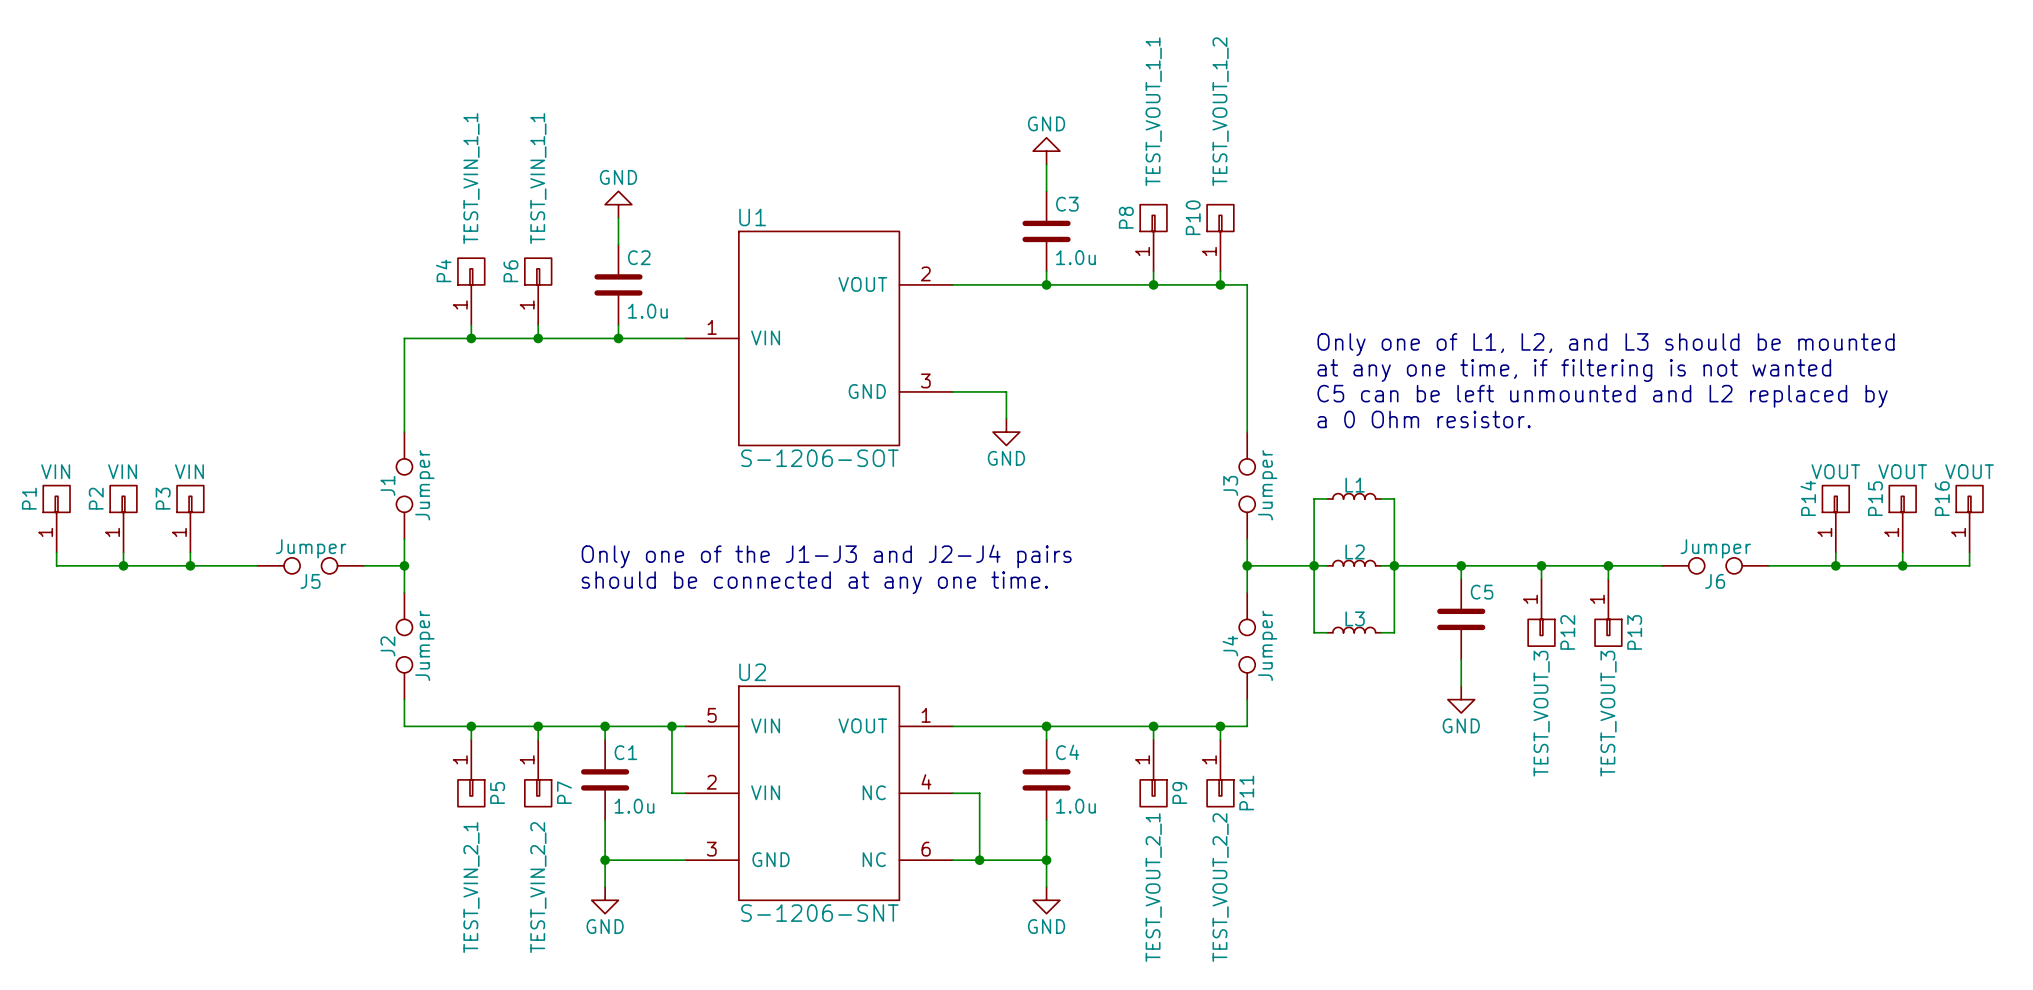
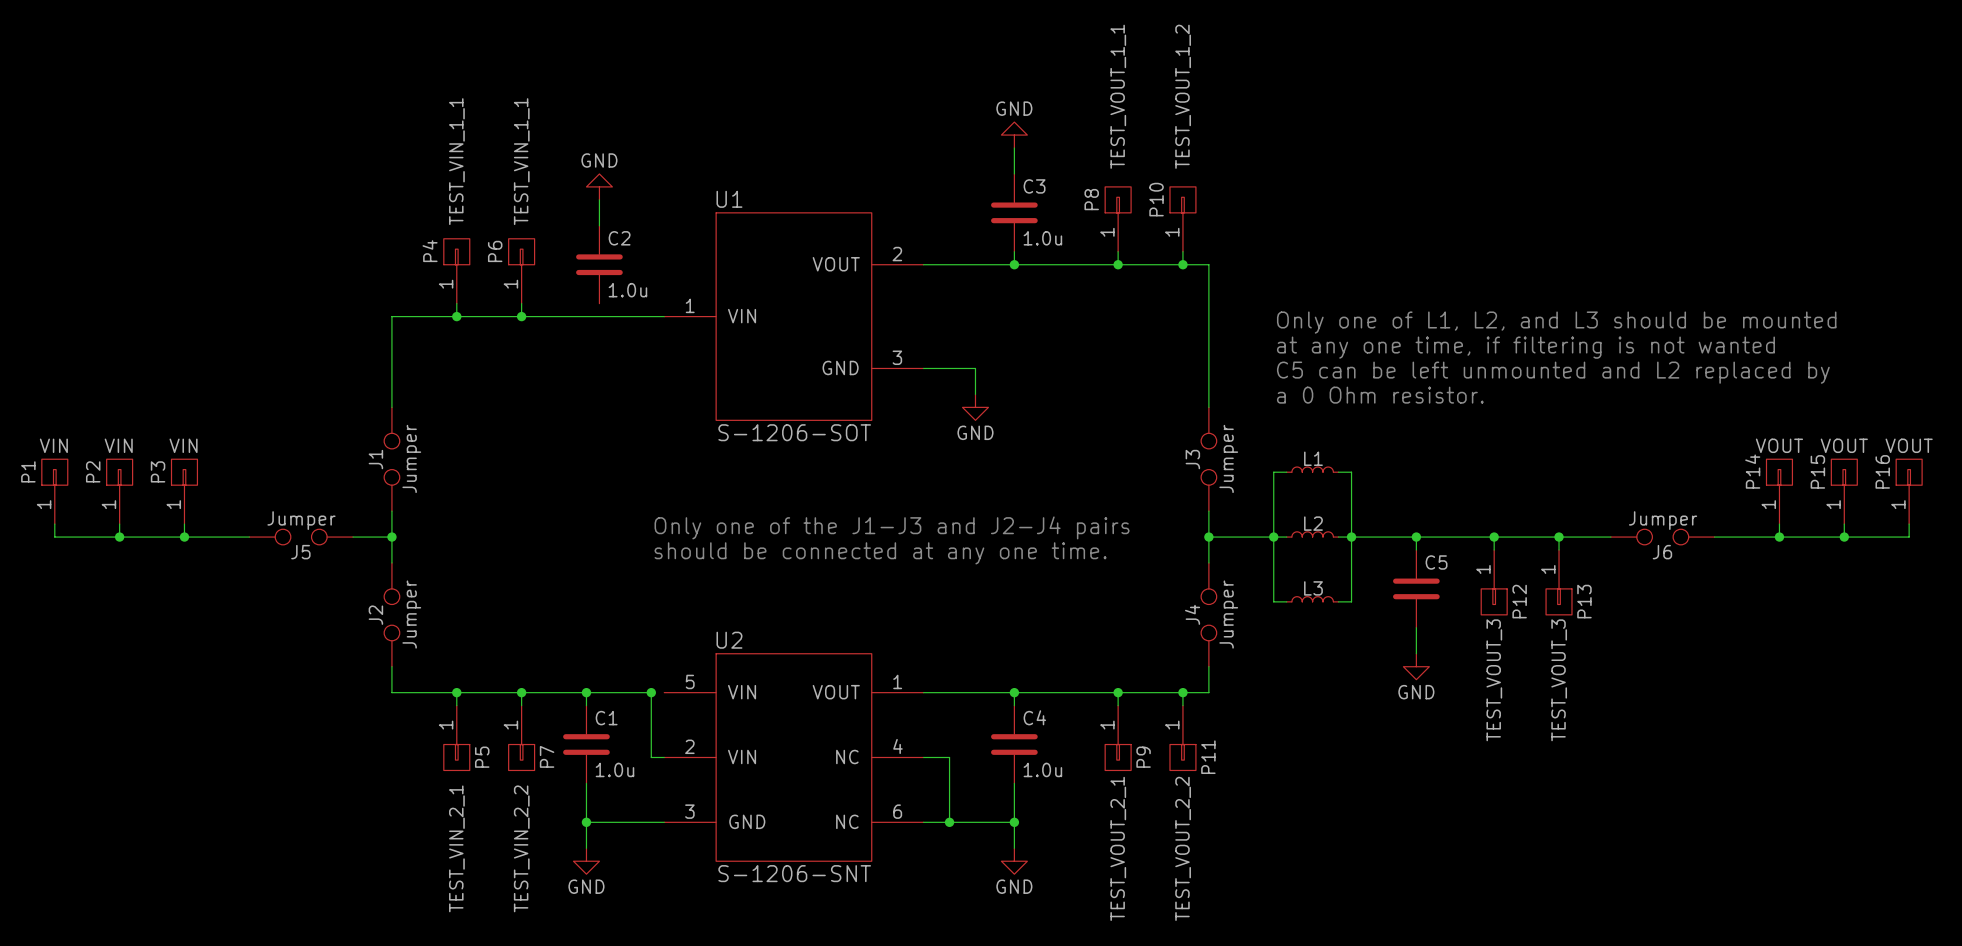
wire: (618, 325) (618, 338) -> none
junction: (618, 338) -> none
text position: Only one of the J1-J3 and J2-J4 pairs (826, 556) -> Only one of the J1-J3 and J2-J4 pairs (892, 527)
text position: should be connected at any one time. (814, 582) -> should be connected at any one time. (880, 553)
wire: (671, 726) (685, 726) -> none

